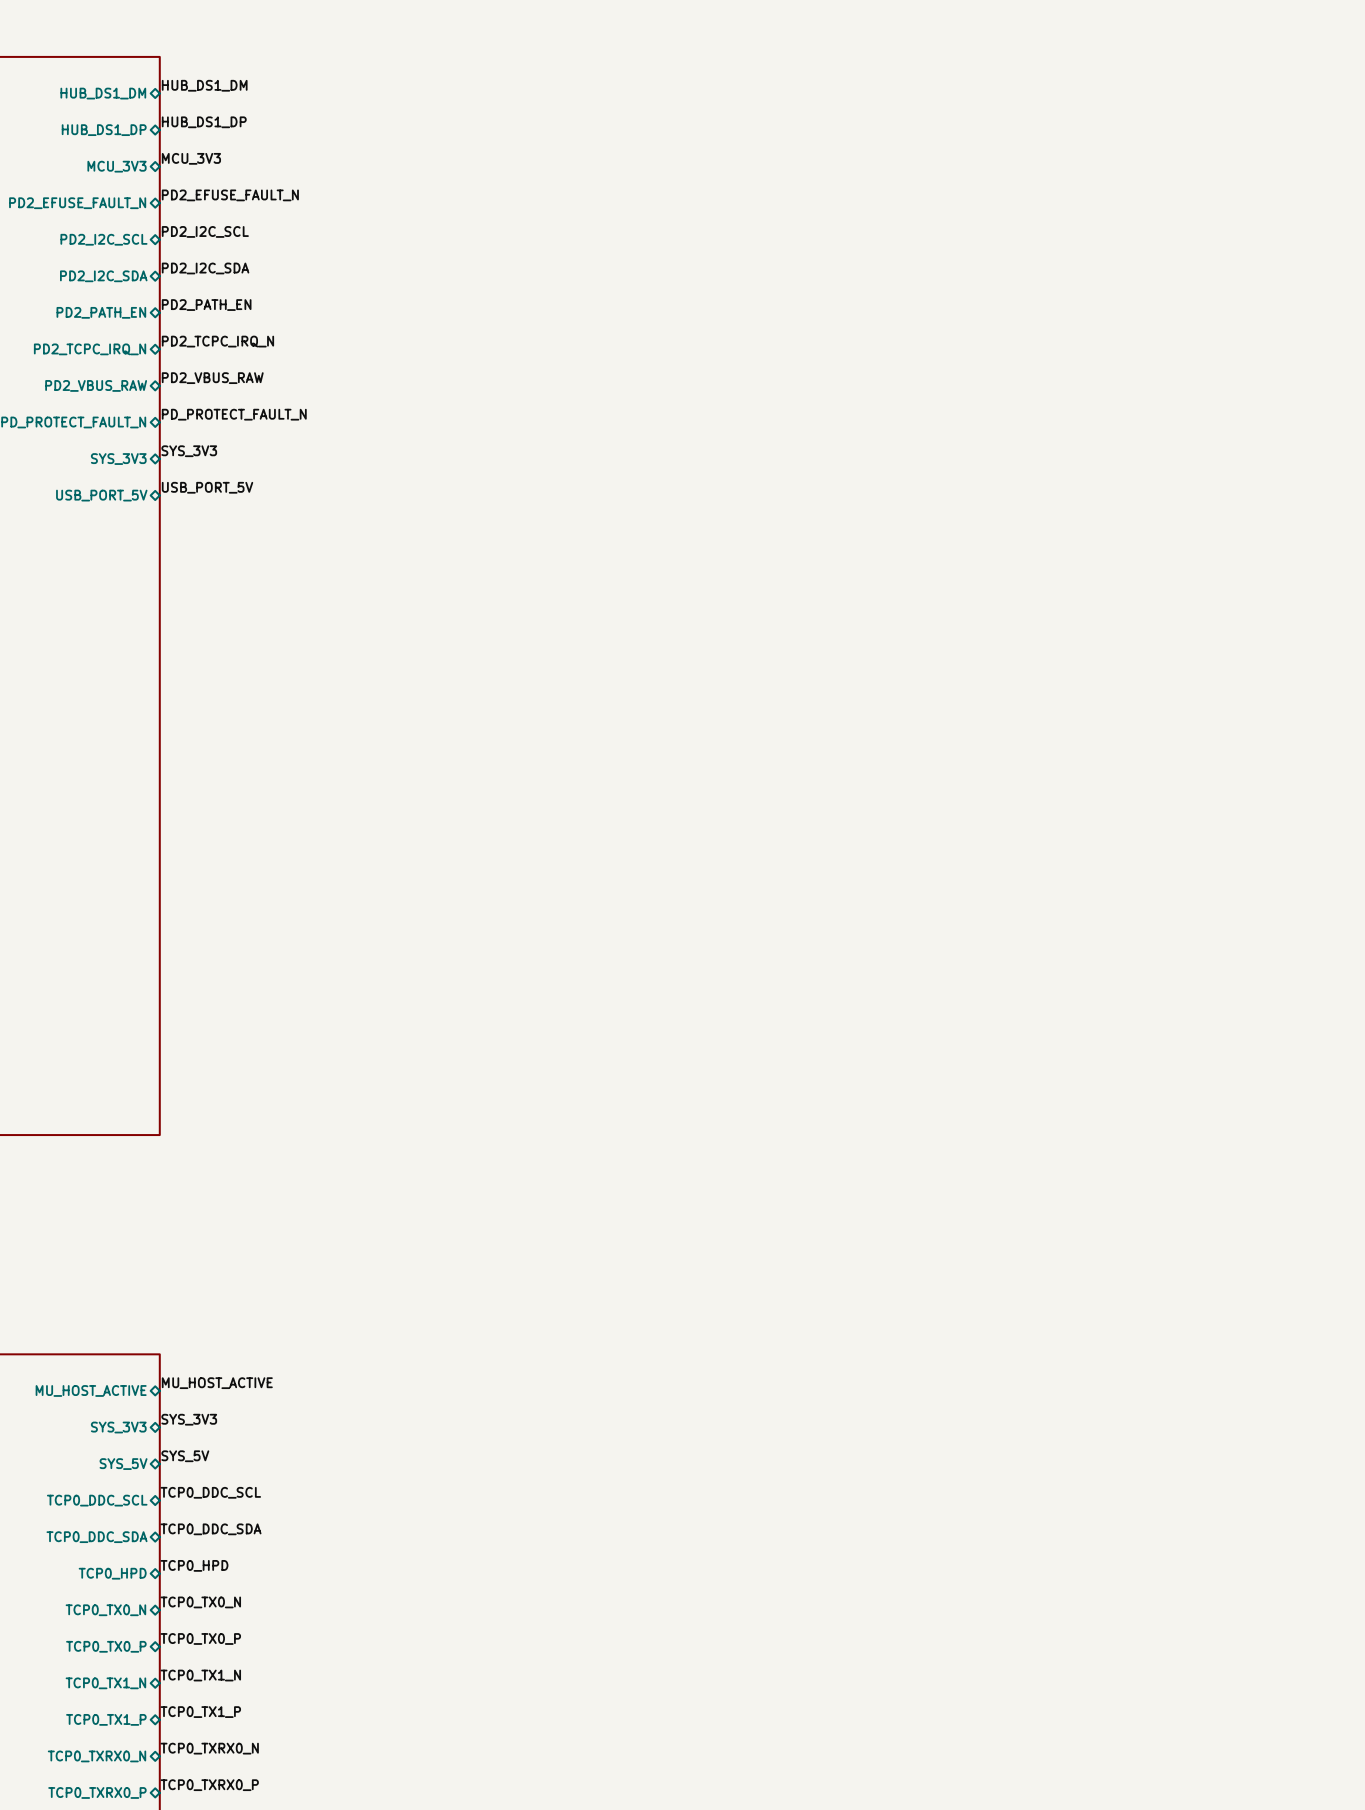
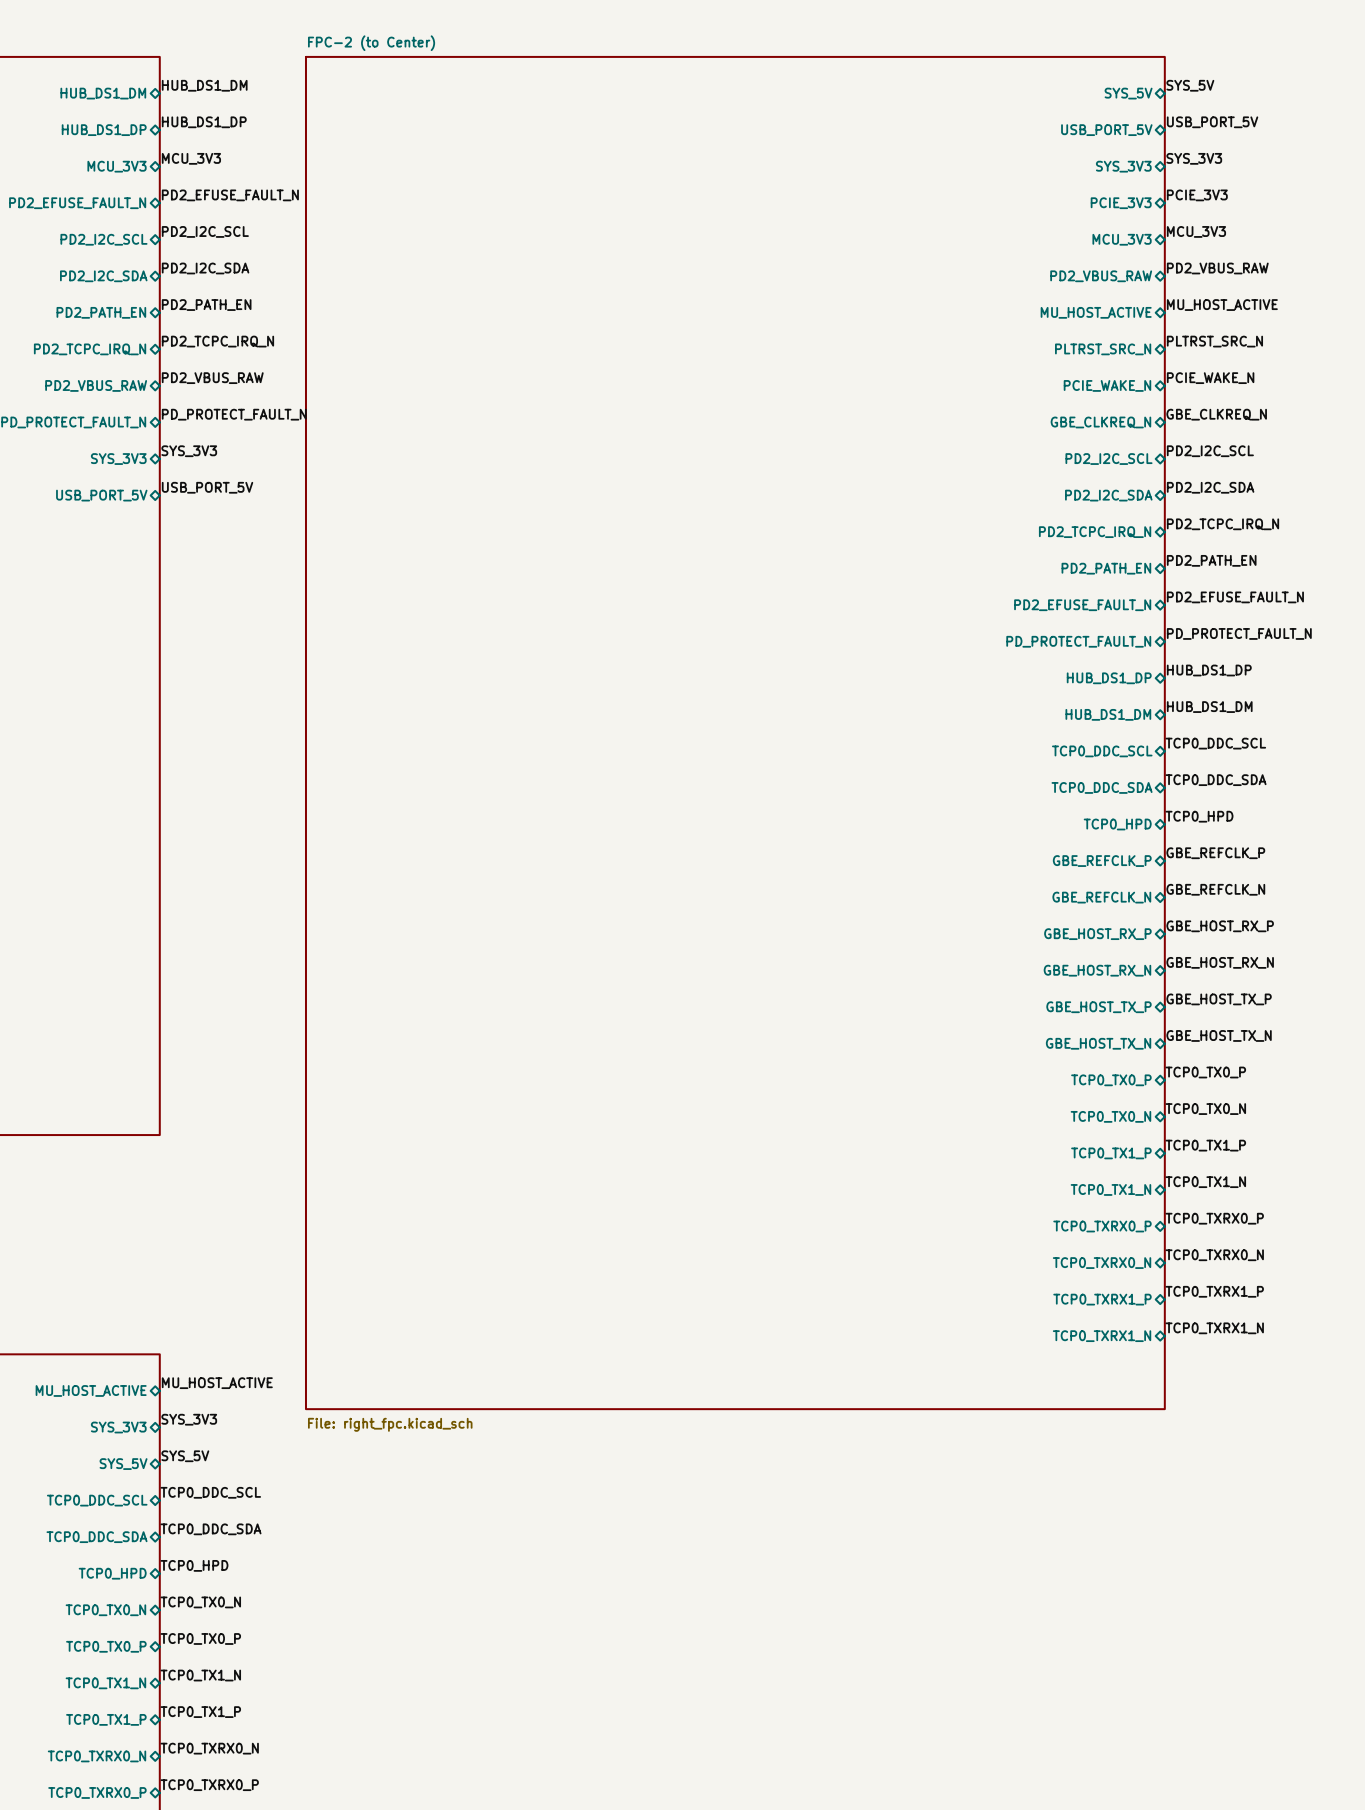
label: none -> SYS_5V (1190, 85)
sheet pin: none -> SYS_5V (1128, 93)
label: none -> USB_PORT_5V (1212, 122)
sheet pin: none -> USB_PORT_5V (1106, 130)
label: none -> SYS_3V3 (1194, 158)
sheet pin: none -> SYS_3V3 (1123, 166)
label: none -> PCIE_3V3 (1197, 195)
sheet pin: none -> PCIE_3V3 (1121, 203)
label: none -> MCU_3V3 (1196, 231)
sheet pin: none -> MCU_3V3 (1122, 239)
label: none -> PD2_VBUS_RAW (1217, 268)
sheet pin: none -> PD2_VBUS_RAW (1101, 276)
label: none -> MU_HOST_ACTIVE (1222, 305)
sheet pin: none -> MU_HOST_ACTIVE (1096, 312)
label: none -> PLTRST_SRC_N (1214, 341)
sheet pin: none -> PLTRST_SRC_N (1103, 349)
label: none -> PCIE_WAKE_N (1210, 378)
sheet pin: none -> PCIE_WAKE_N (1107, 385)
label: none -> GBE_CLKREQ_N (1216, 414)
sheet pin: none -> GBE_CLKREQ_N (1100, 422)
label: none -> PD2_I2C_SCL (1210, 451)
sheet pin: none -> PD2_I2C_SCL (1109, 459)
label: none -> PD2_I2C_SDA (1210, 487)
sheet pin: none -> PD2_I2C_SDA (1108, 495)
label: none -> PD2_TCPC_IRQ_N (1222, 524)
sheet pin: none -> PD2_TCPC_IRQ_N (1095, 532)
label: none -> PD2_PATH_EN (1211, 560)
sheet pin: none -> PD2_PATH_EN (1106, 568)
label: none -> PD2_EFUSE_FAULT_N (1235, 597)
sheet pin: none -> PD2_EFUSE_FAULT_N (1082, 605)
label: none -> PD_PROTECT_FAULT_N (1239, 633)
sheet pin: none -> PD_PROTECT_FAULT_N (1078, 641)
label: none -> HUB_DS1_DP (1209, 670)
sheet pin: none -> HUB_DS1_DP (1109, 678)
label: none -> HUB_DS1_DM (1209, 707)
sheet pin: none -> HUB_DS1_DM (1108, 714)
sheet FPC-2 (to Center): none -> File: right_fpc.kicad_sch (735, 733)
label: none -> TCP0_DDC_SCL (1215, 743)
sheet pin: none -> TCP0_DDC_SCL (1102, 751)
label: none -> TCP0_DDC_SDA (1216, 780)
sheet pin: none -> TCP0_DDC_SDA (1102, 787)
label: none -> TCP0_HPD (1199, 816)
sheet pin: none -> TCP0_HPD (1117, 824)
label: none -> GBE_REFCLK_P (1215, 853)
sheet pin: none -> GBE_REFCLK_P (1102, 861)
label: none -> GBE_REFCLK_N (1215, 889)
sheet pin: none -> GBE_REFCLK_N (1101, 897)
label: none -> GBE_HOST_RX_P (1220, 926)
sheet pin: none -> GBE_HOST_RX_P (1097, 934)
label: none -> GBE_HOST_RX_N (1220, 962)
sheet pin: none -> GBE_HOST_RX_N (1097, 970)
label: none -> GBE_HOST_TX_P (1219, 999)
sheet pin: none -> GBE_HOST_TX_P (1098, 1007)
label: none -> GBE_HOST_TX_N (1219, 1035)
sheet pin: none -> GBE_HOST_TX_N (1098, 1043)
label: none -> TCP0_TX0_P (1205, 1072)
sheet pin: none -> TCP0_TX0_P (1111, 1080)
label: none -> TCP0_TX0_N (1205, 1109)
sheet pin: none -> TCP0_TX0_N (1110, 1116)
label: none -> TCP0_TX1_P (1205, 1145)
sheet pin: none -> TCP0_TX1_P (1111, 1153)
label: none -> TCP0_TX1_N (1205, 1182)
sheet pin: none -> TCP0_TX1_N (1110, 1189)
label: none -> TCP0_TXRX0_P (1214, 1218)
sheet pin: none -> TCP0_TXRX0_P (1102, 1226)
label: none -> TCP0_TXRX0_N (1214, 1255)
sheet pin: none -> TCP0_TXRX0_N (1102, 1263)
label: none -> TCP0_TXRX1_P (1214, 1291)
sheet pin: none -> TCP0_TXRX1_P (1102, 1299)
label: none -> TCP0_TXRX1_N (1214, 1328)
sheet pin: none -> TCP0_TXRX1_N (1102, 1336)

